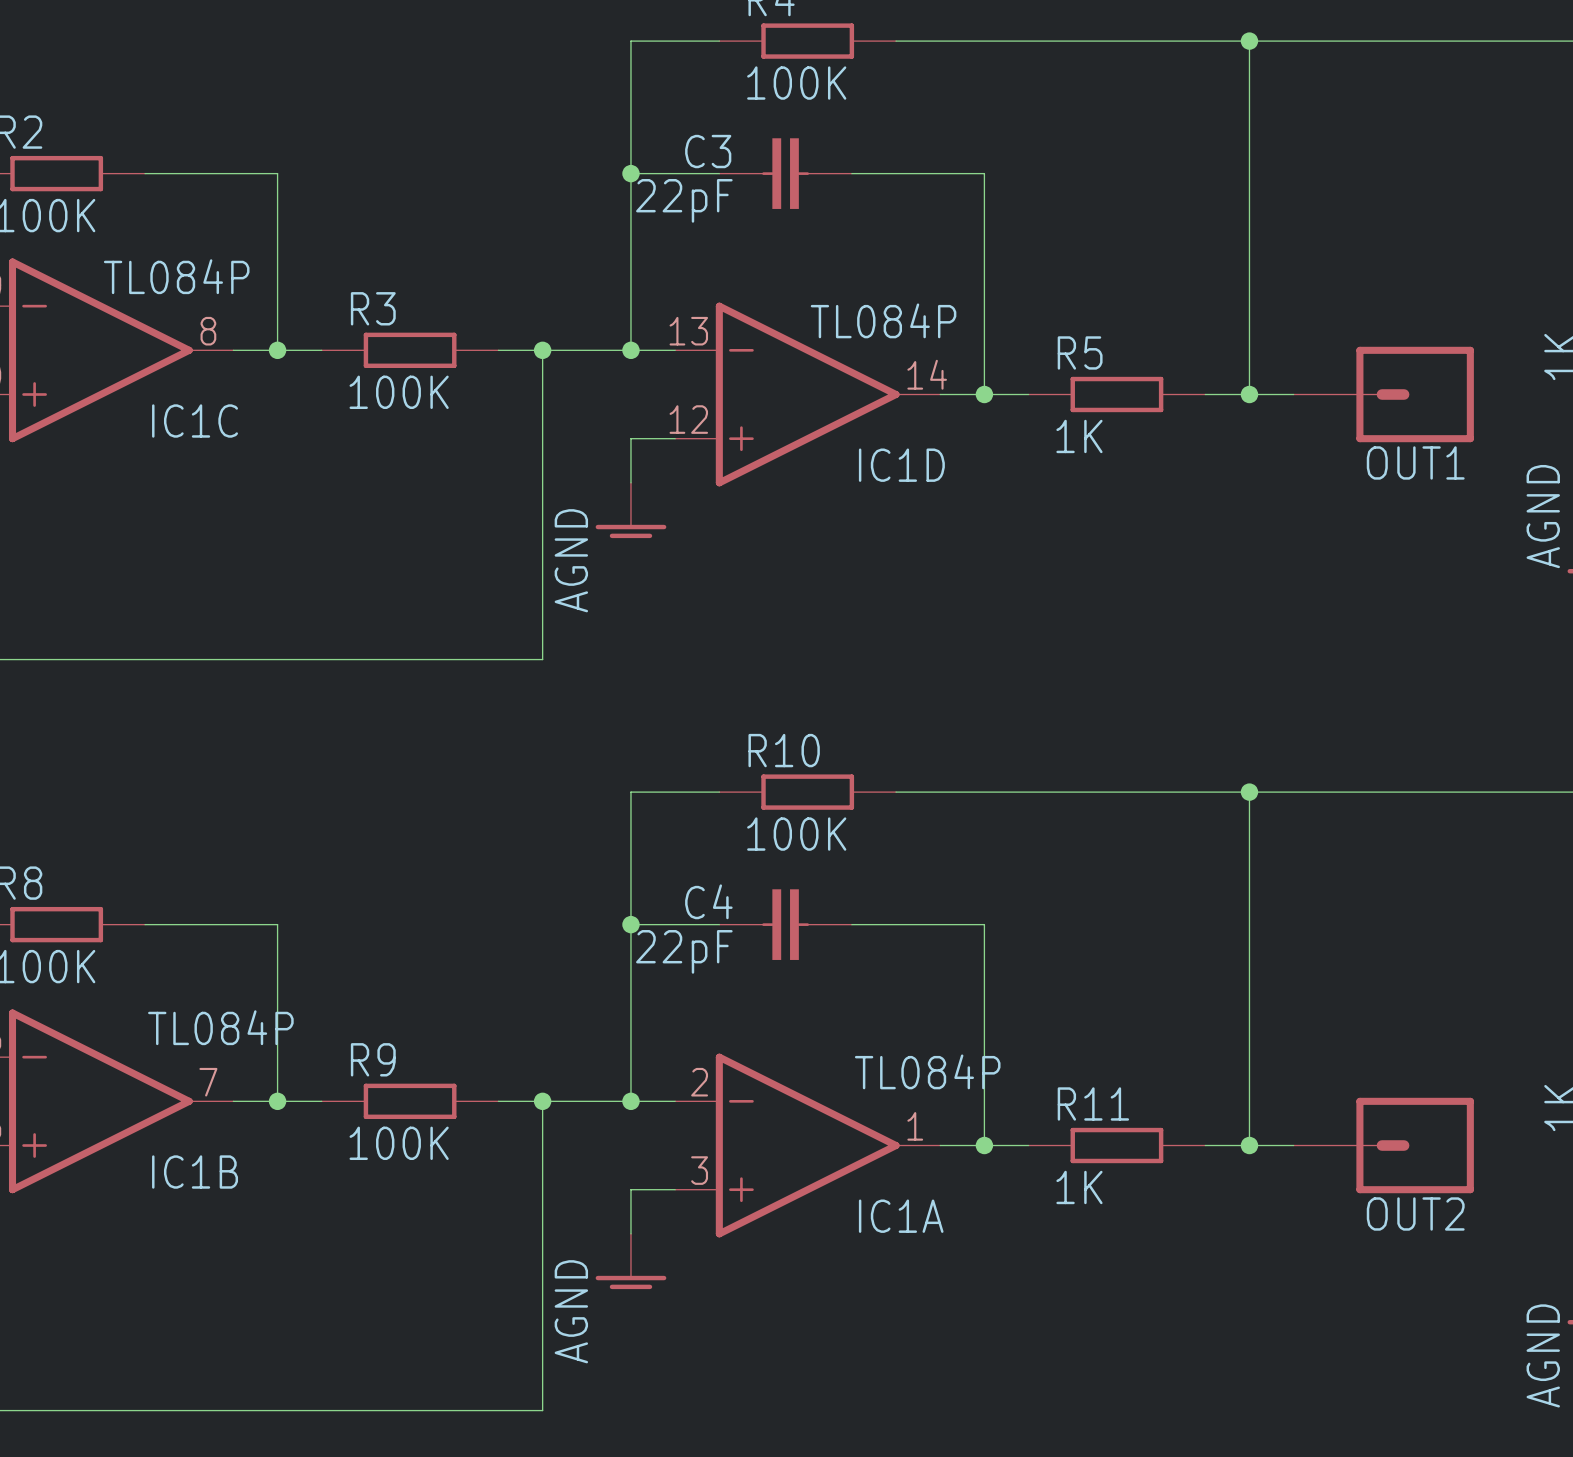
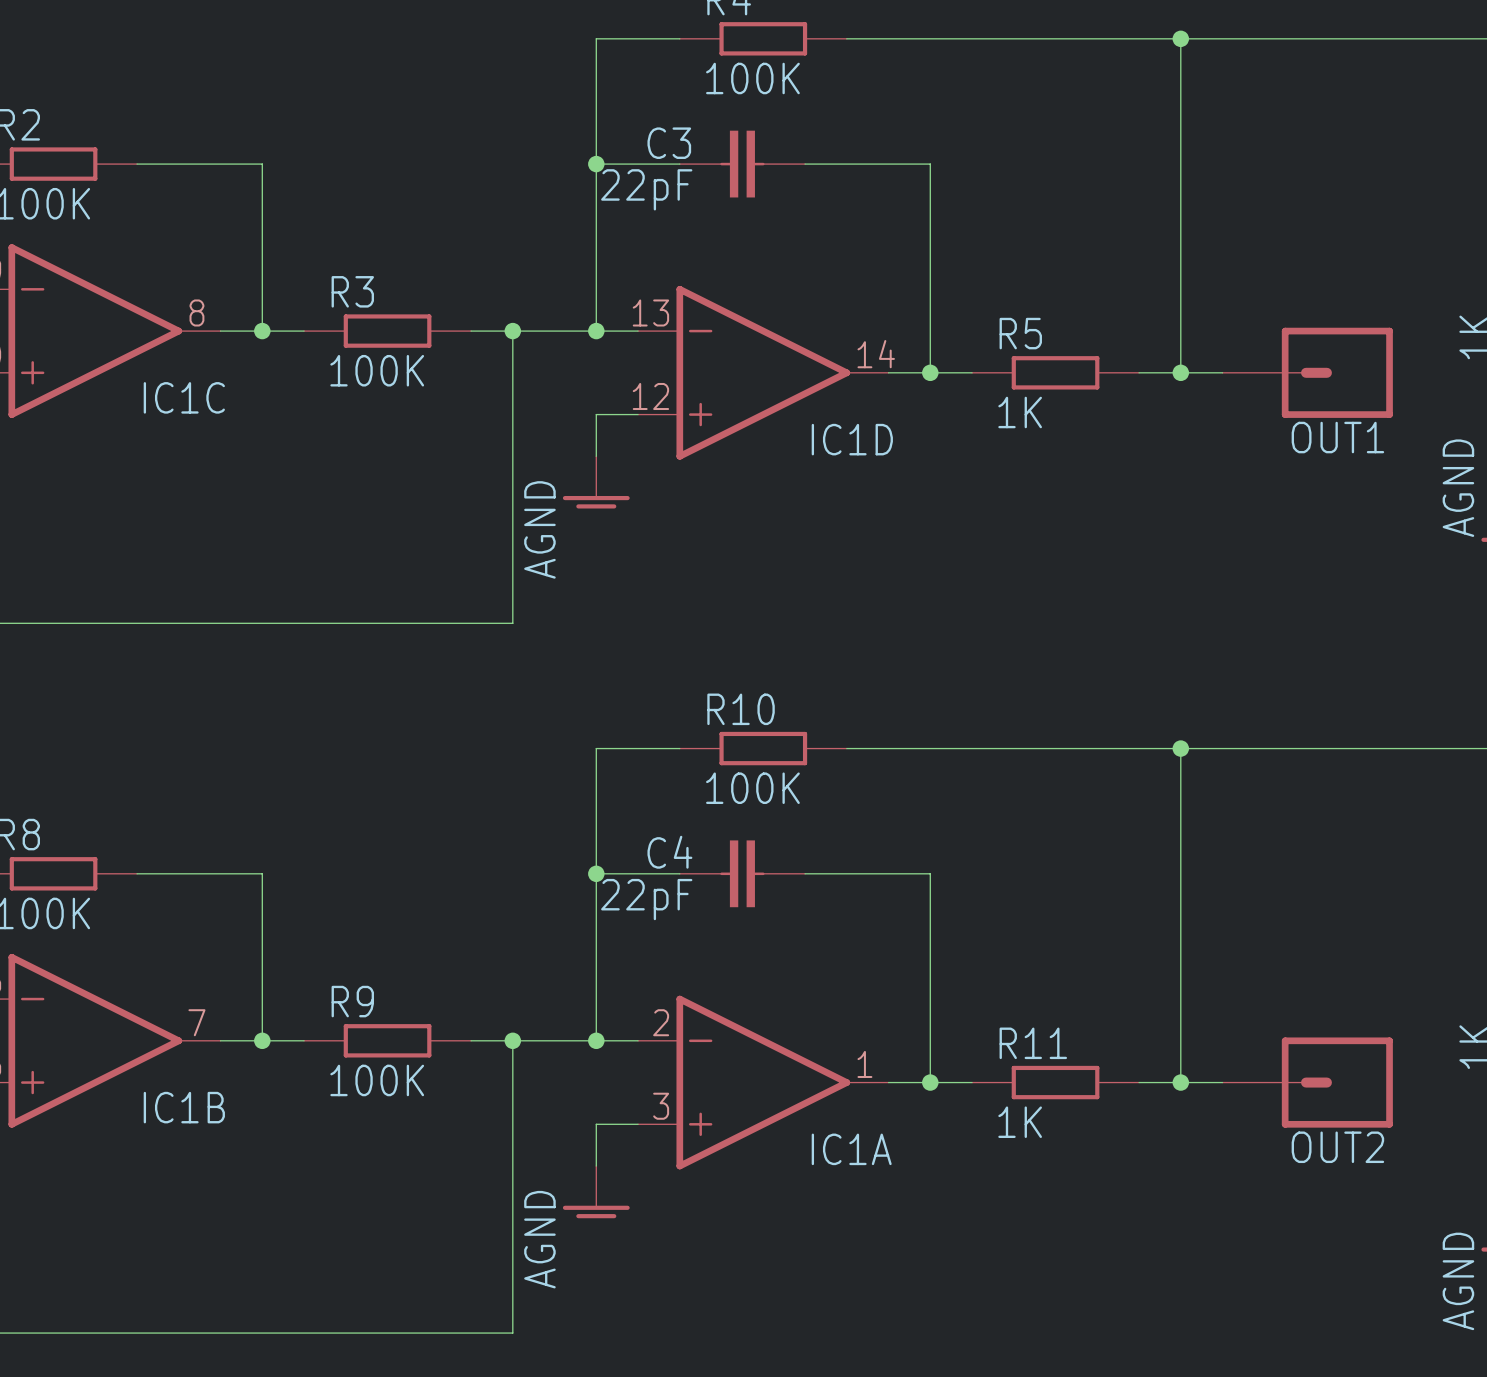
IC1C value: TL084P (176, 276) -> none
IC1D value: TL084P (883, 320) -> none
IC1B value: TL084P (220, 1027) -> none
IC1A value: TL084P (927, 1071) -> none

